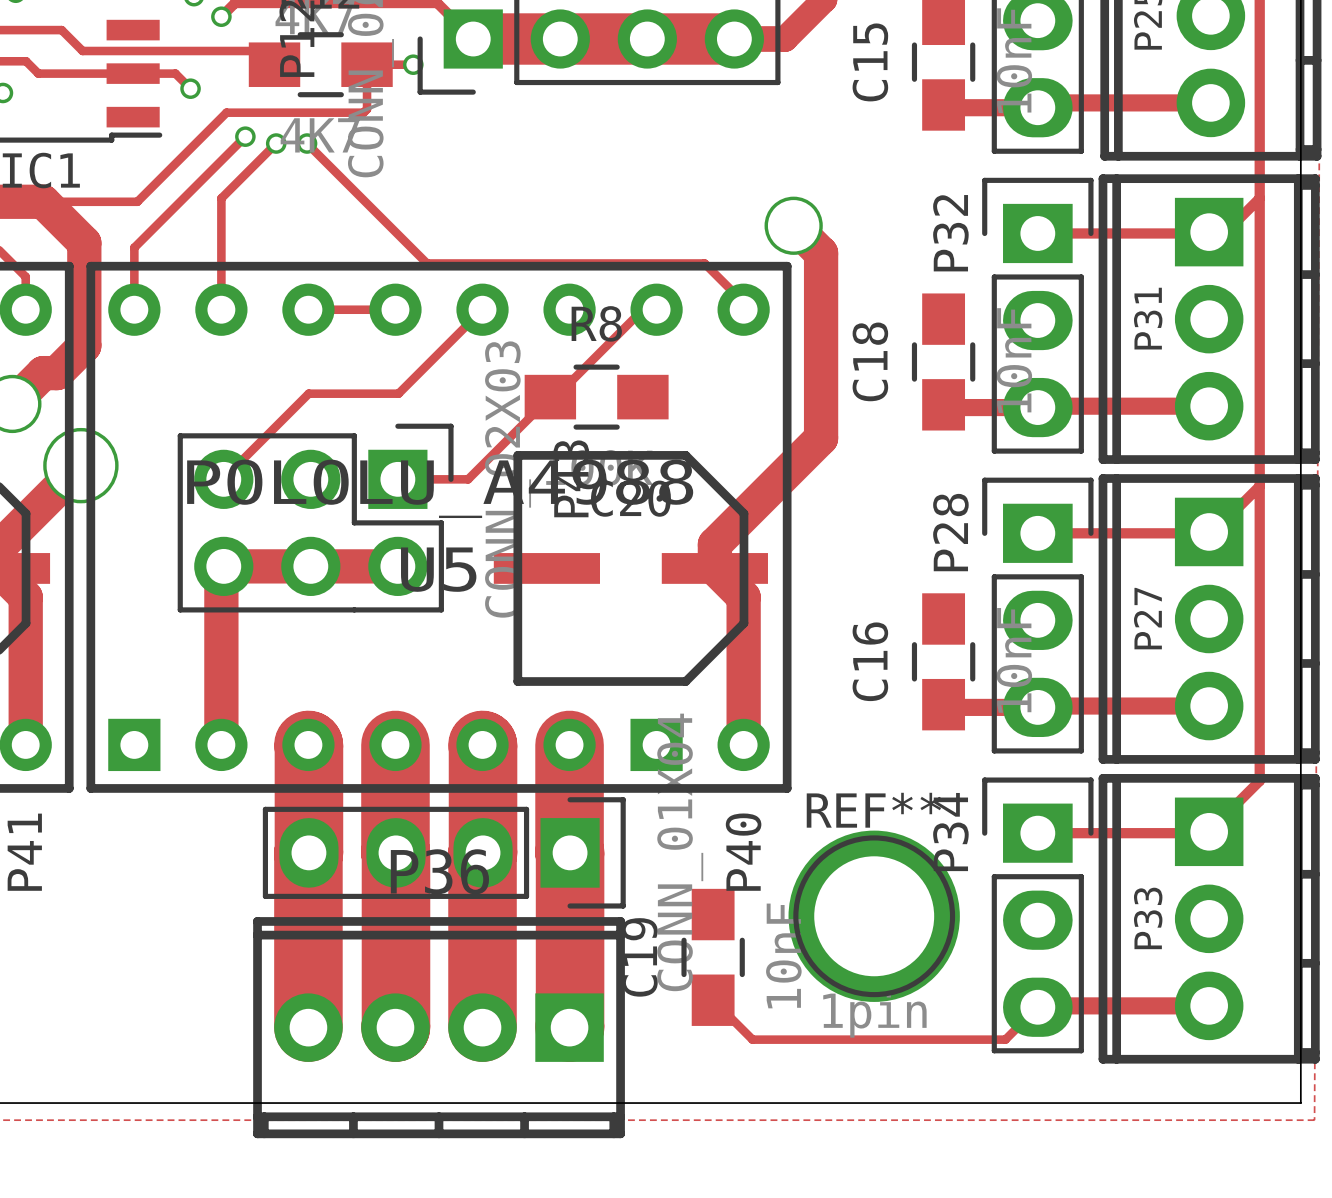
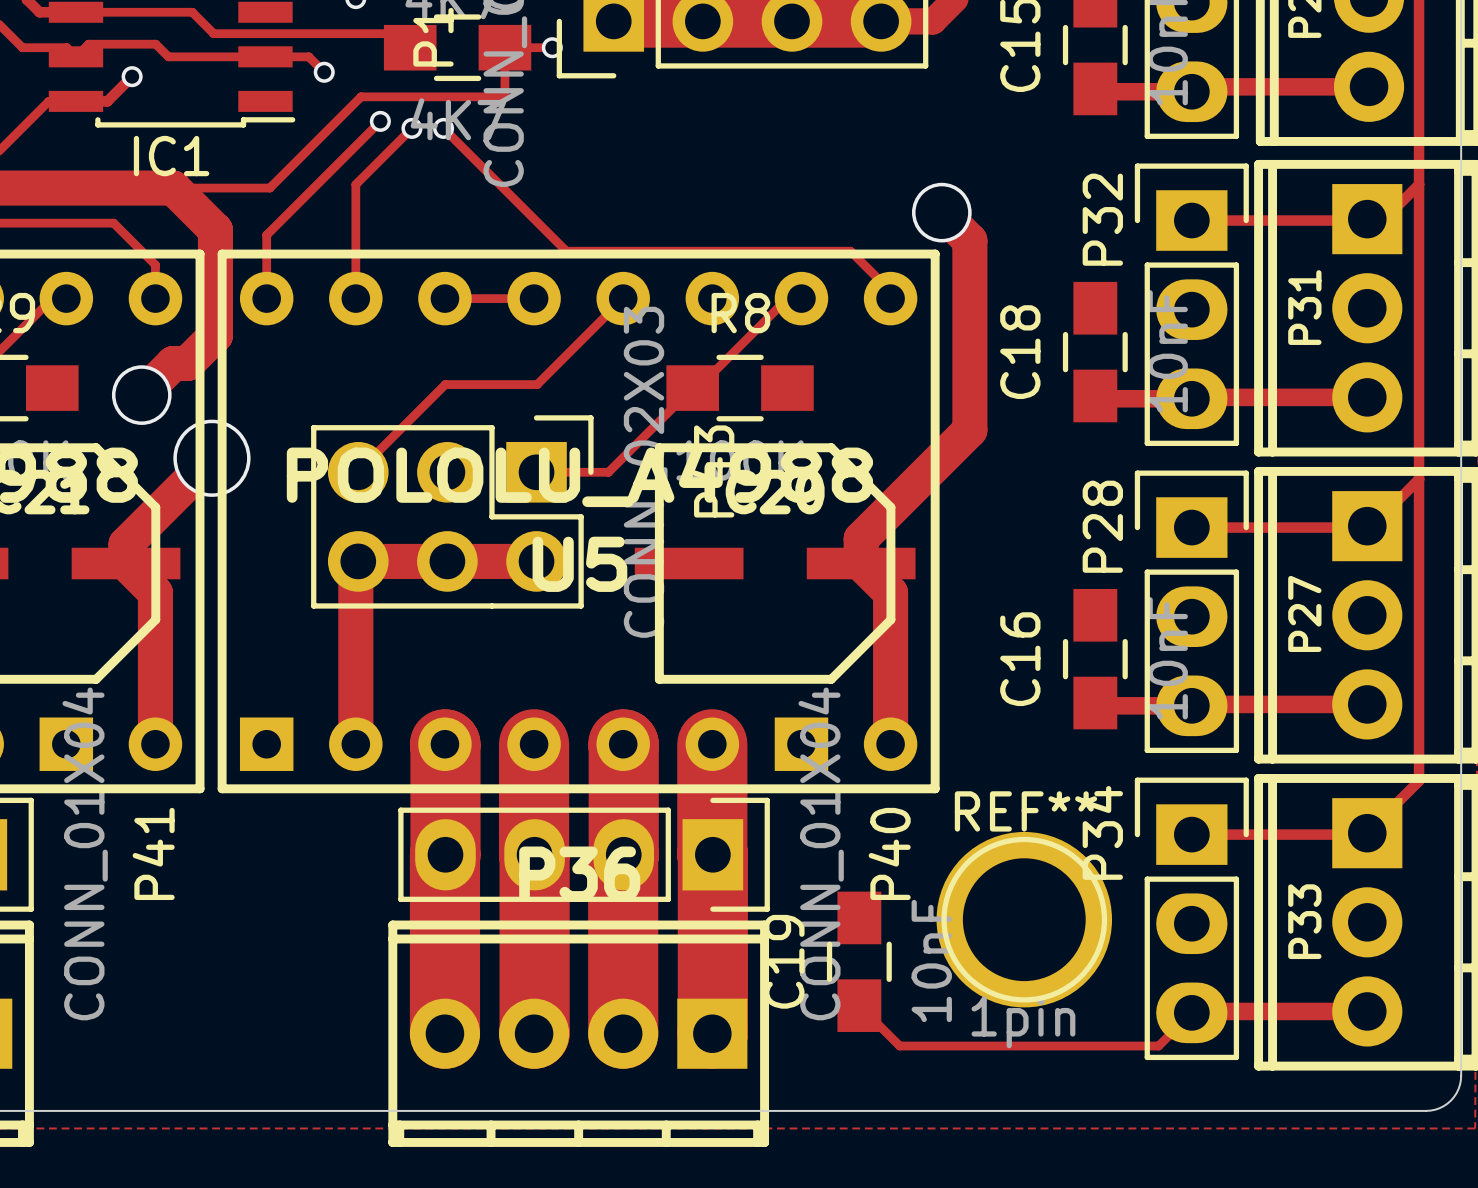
board edge: (1300, 1068) (1300, 1103) (1266, 1103) -> (1461, 1075) (1458, 1089) (1450, 1100) (1439, 1108) (1426, 1110)

